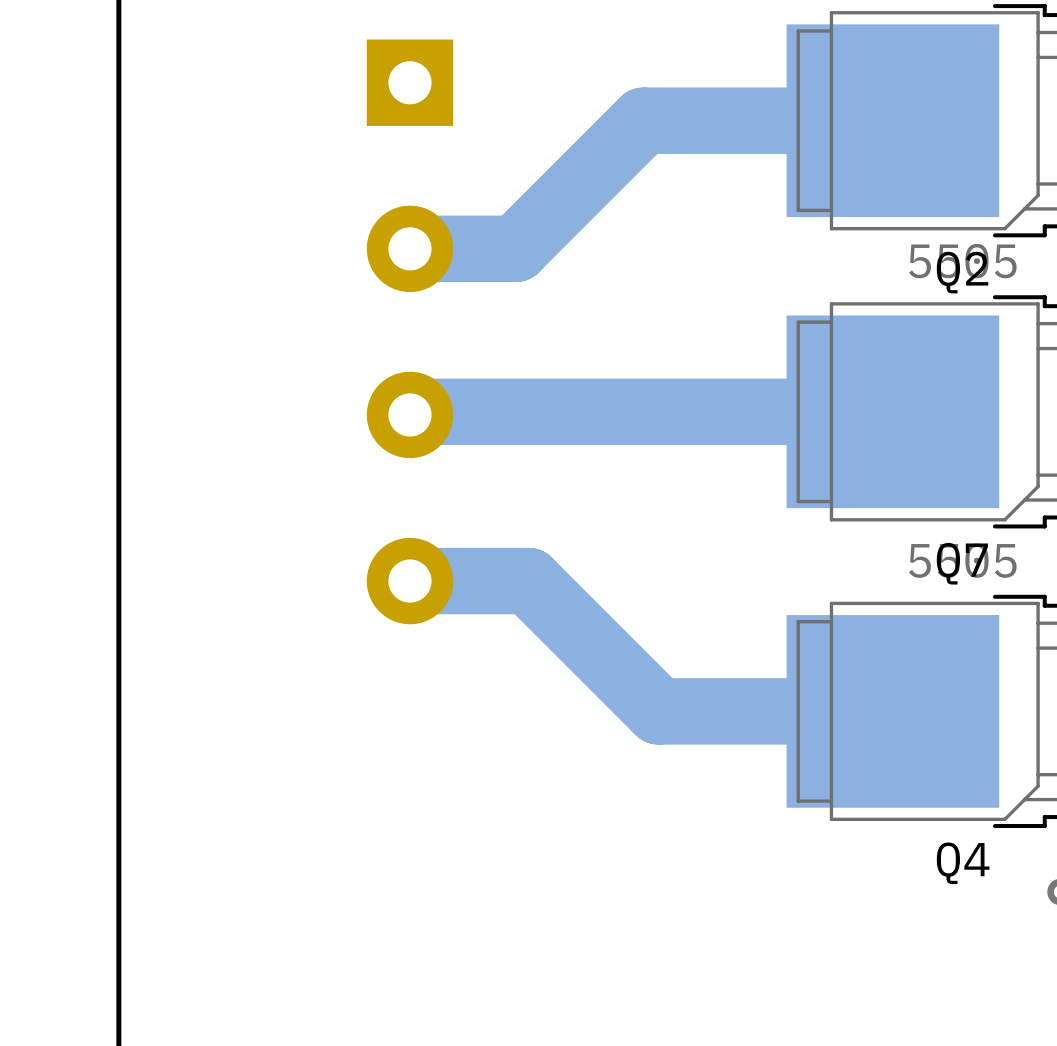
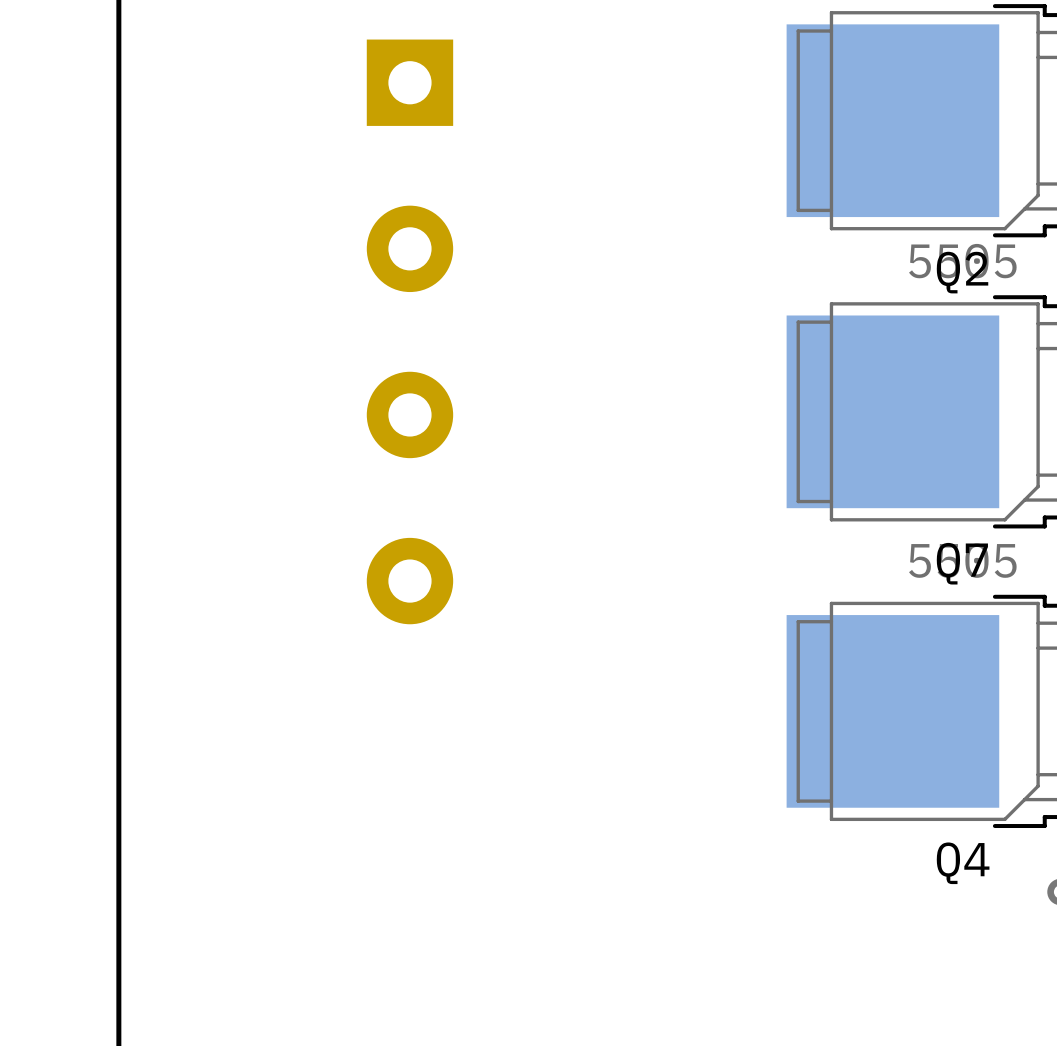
track: (892, 120) (643, 120) (515, 248) (409, 248) -> none
track: (892, 411) (413, 411) (409, 414) -> none
track: (409, 581) (528, 581) (658, 711) (892, 711) -> none

